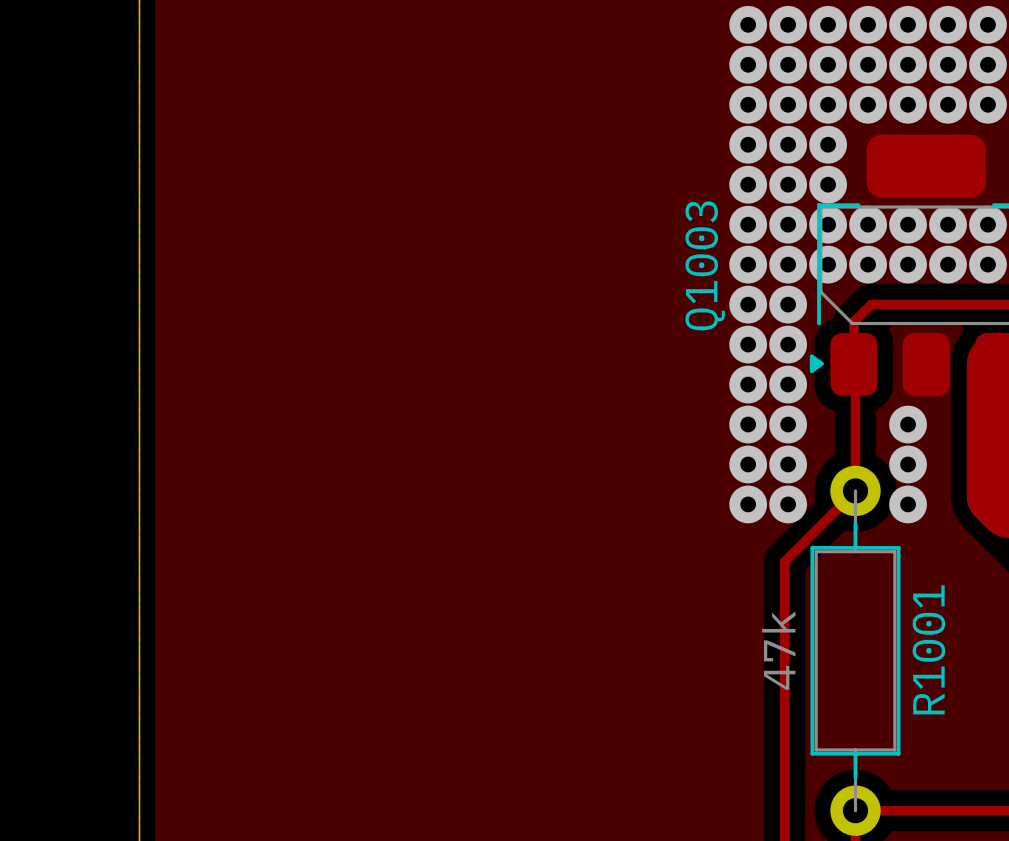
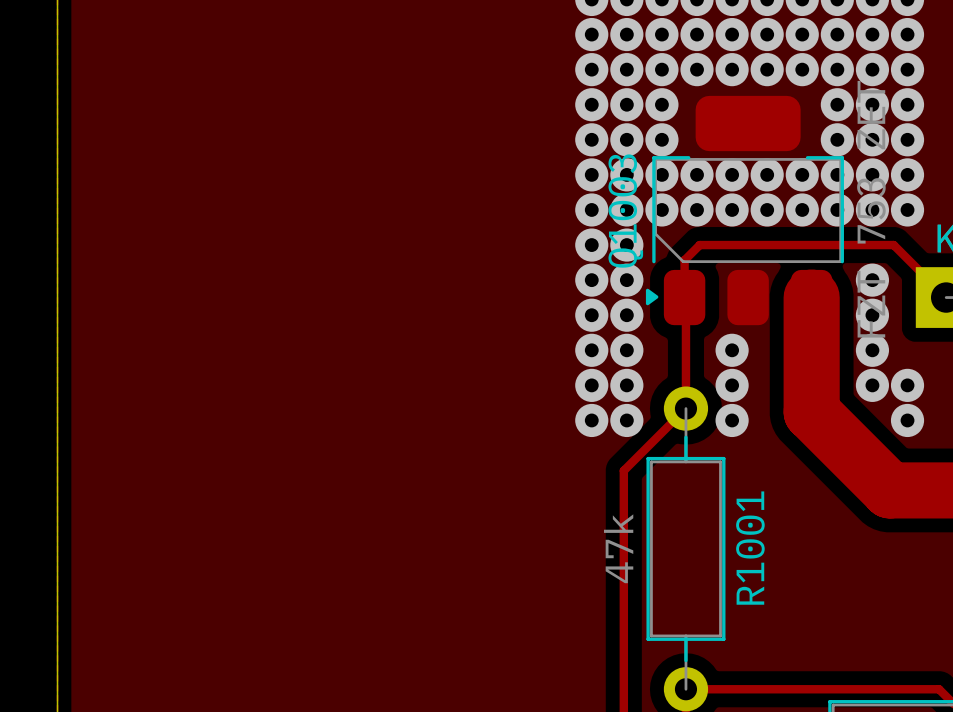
Q1003 name position: Q1003 (705, 265) -> Q1003 (625, 211)

